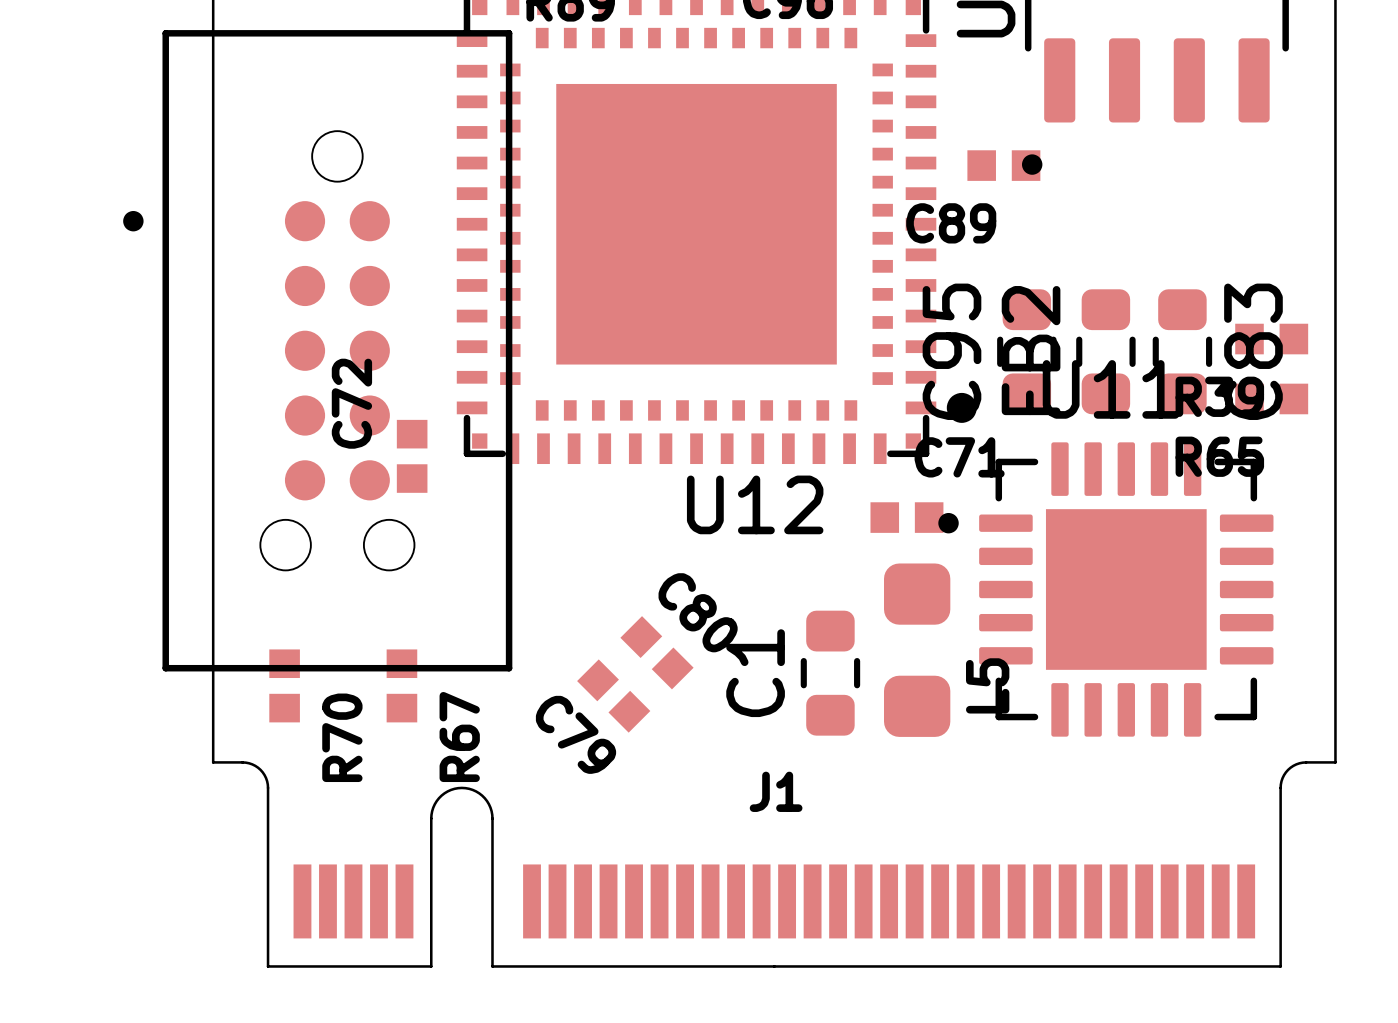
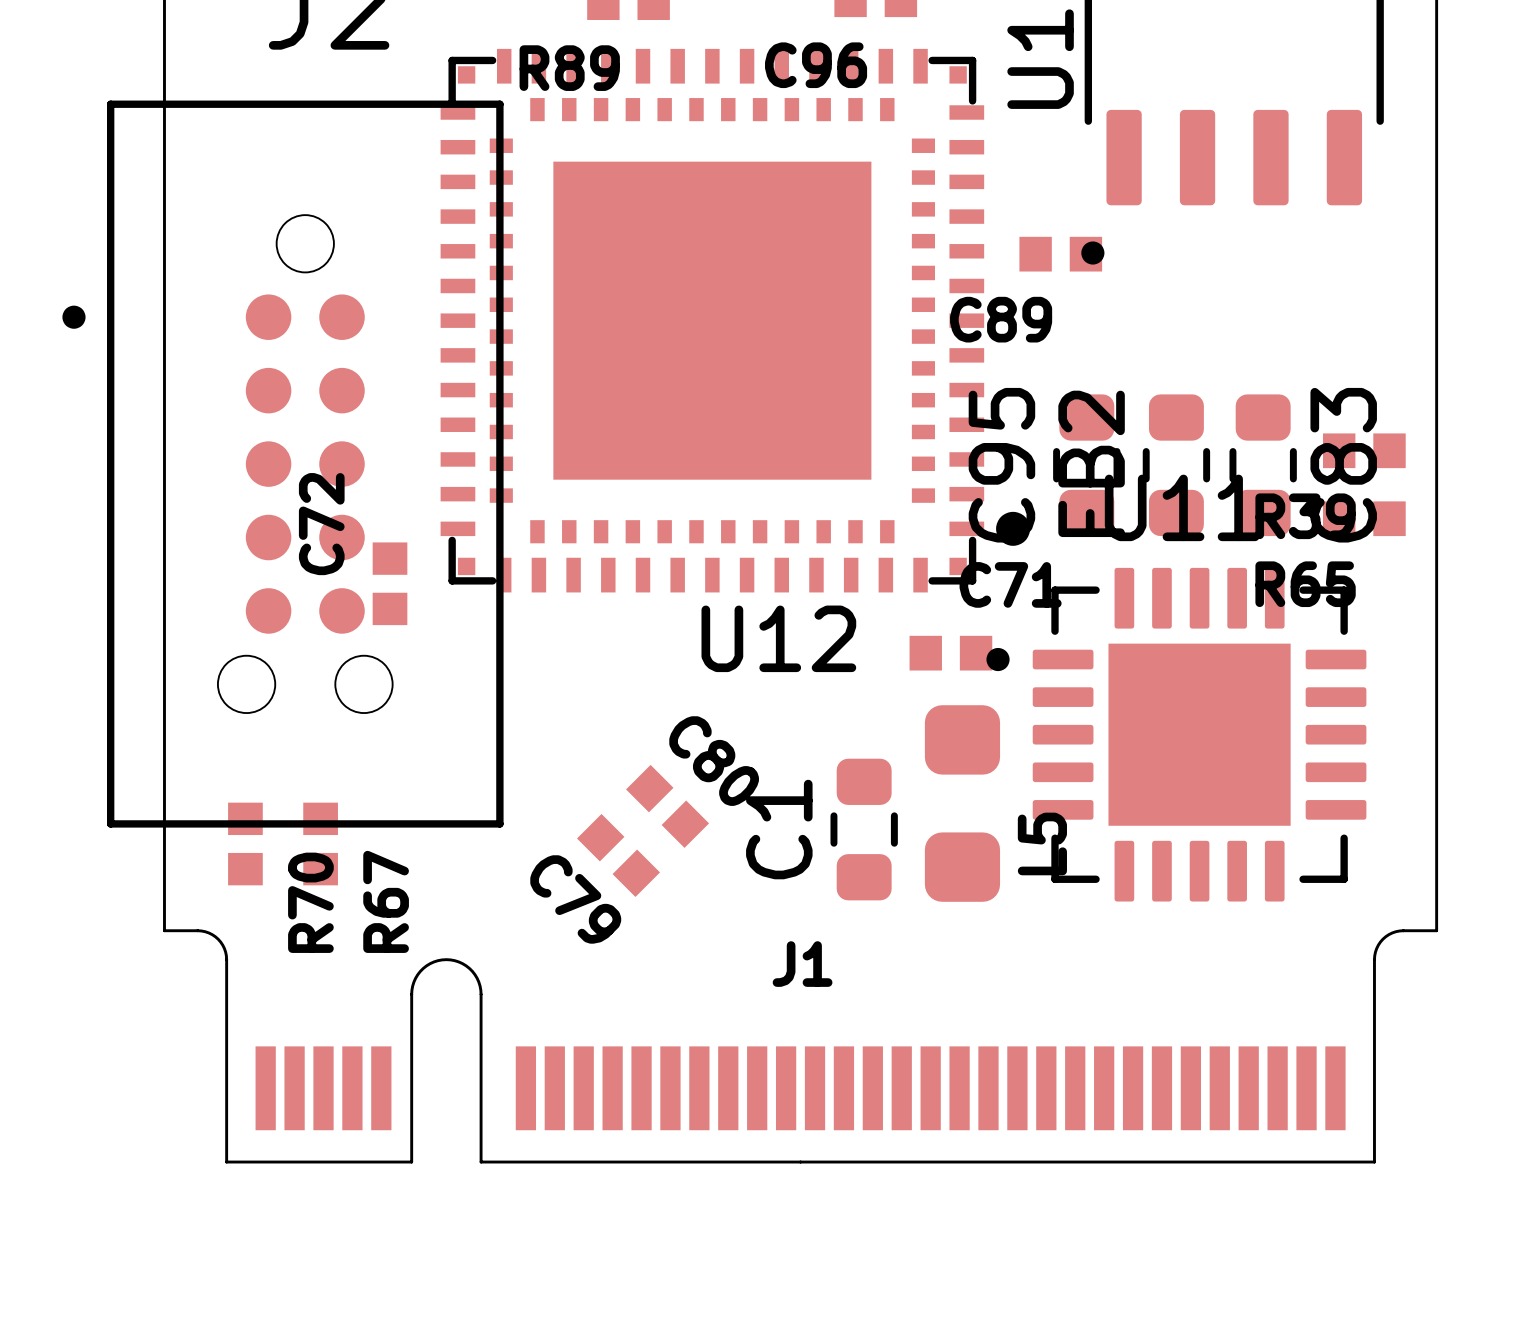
R67 position: (401, 685) -> (320, 843)

